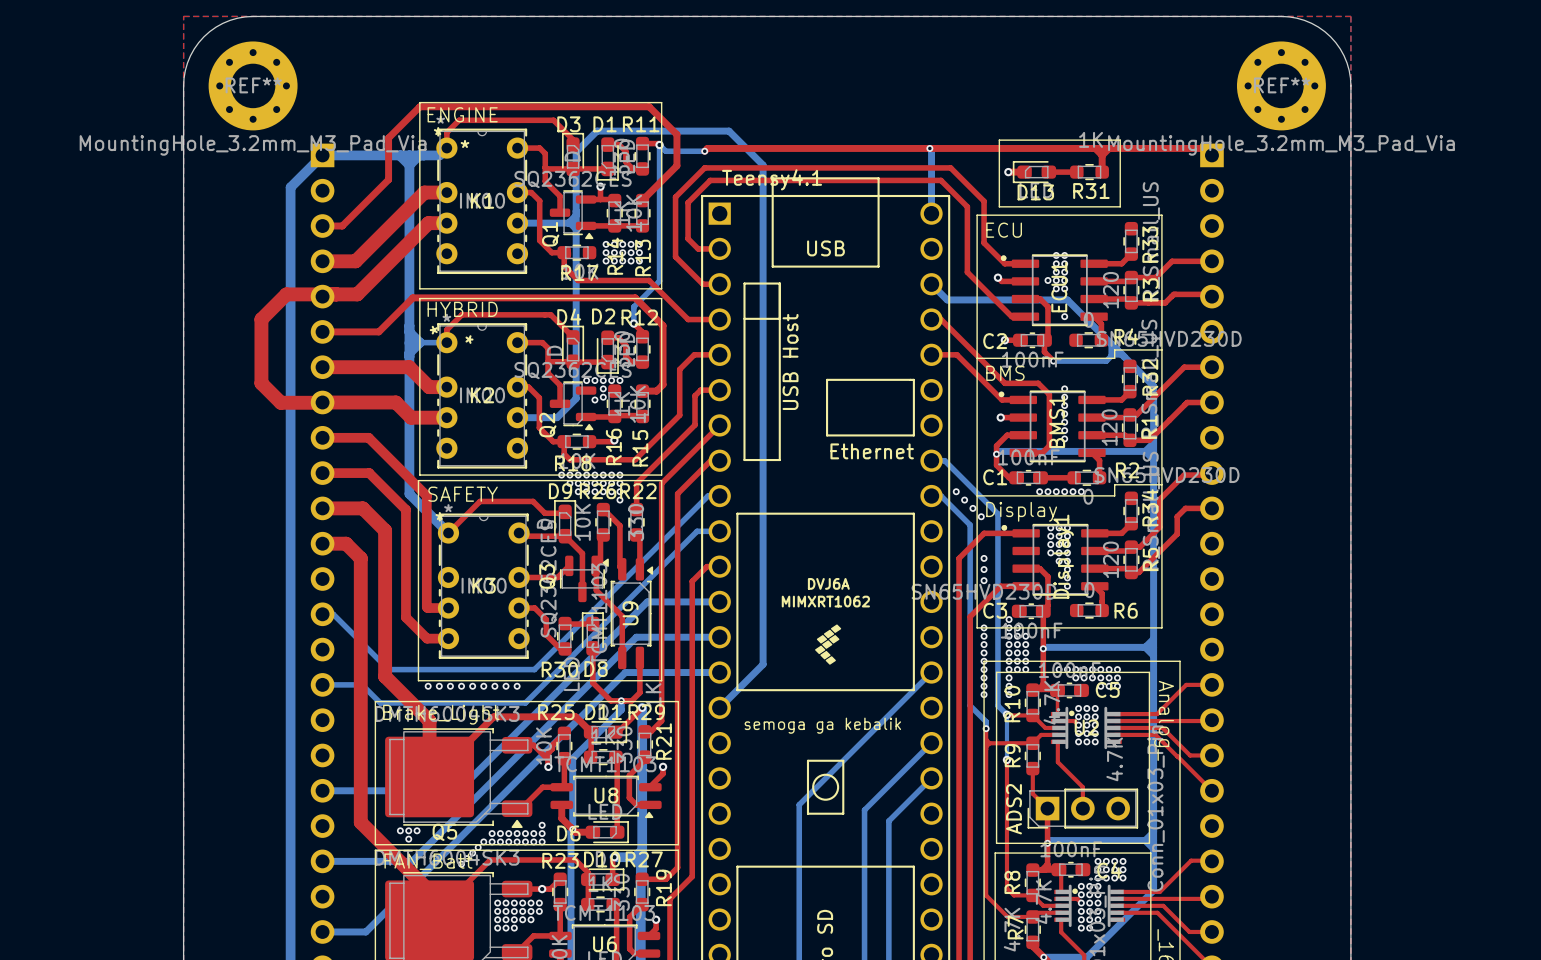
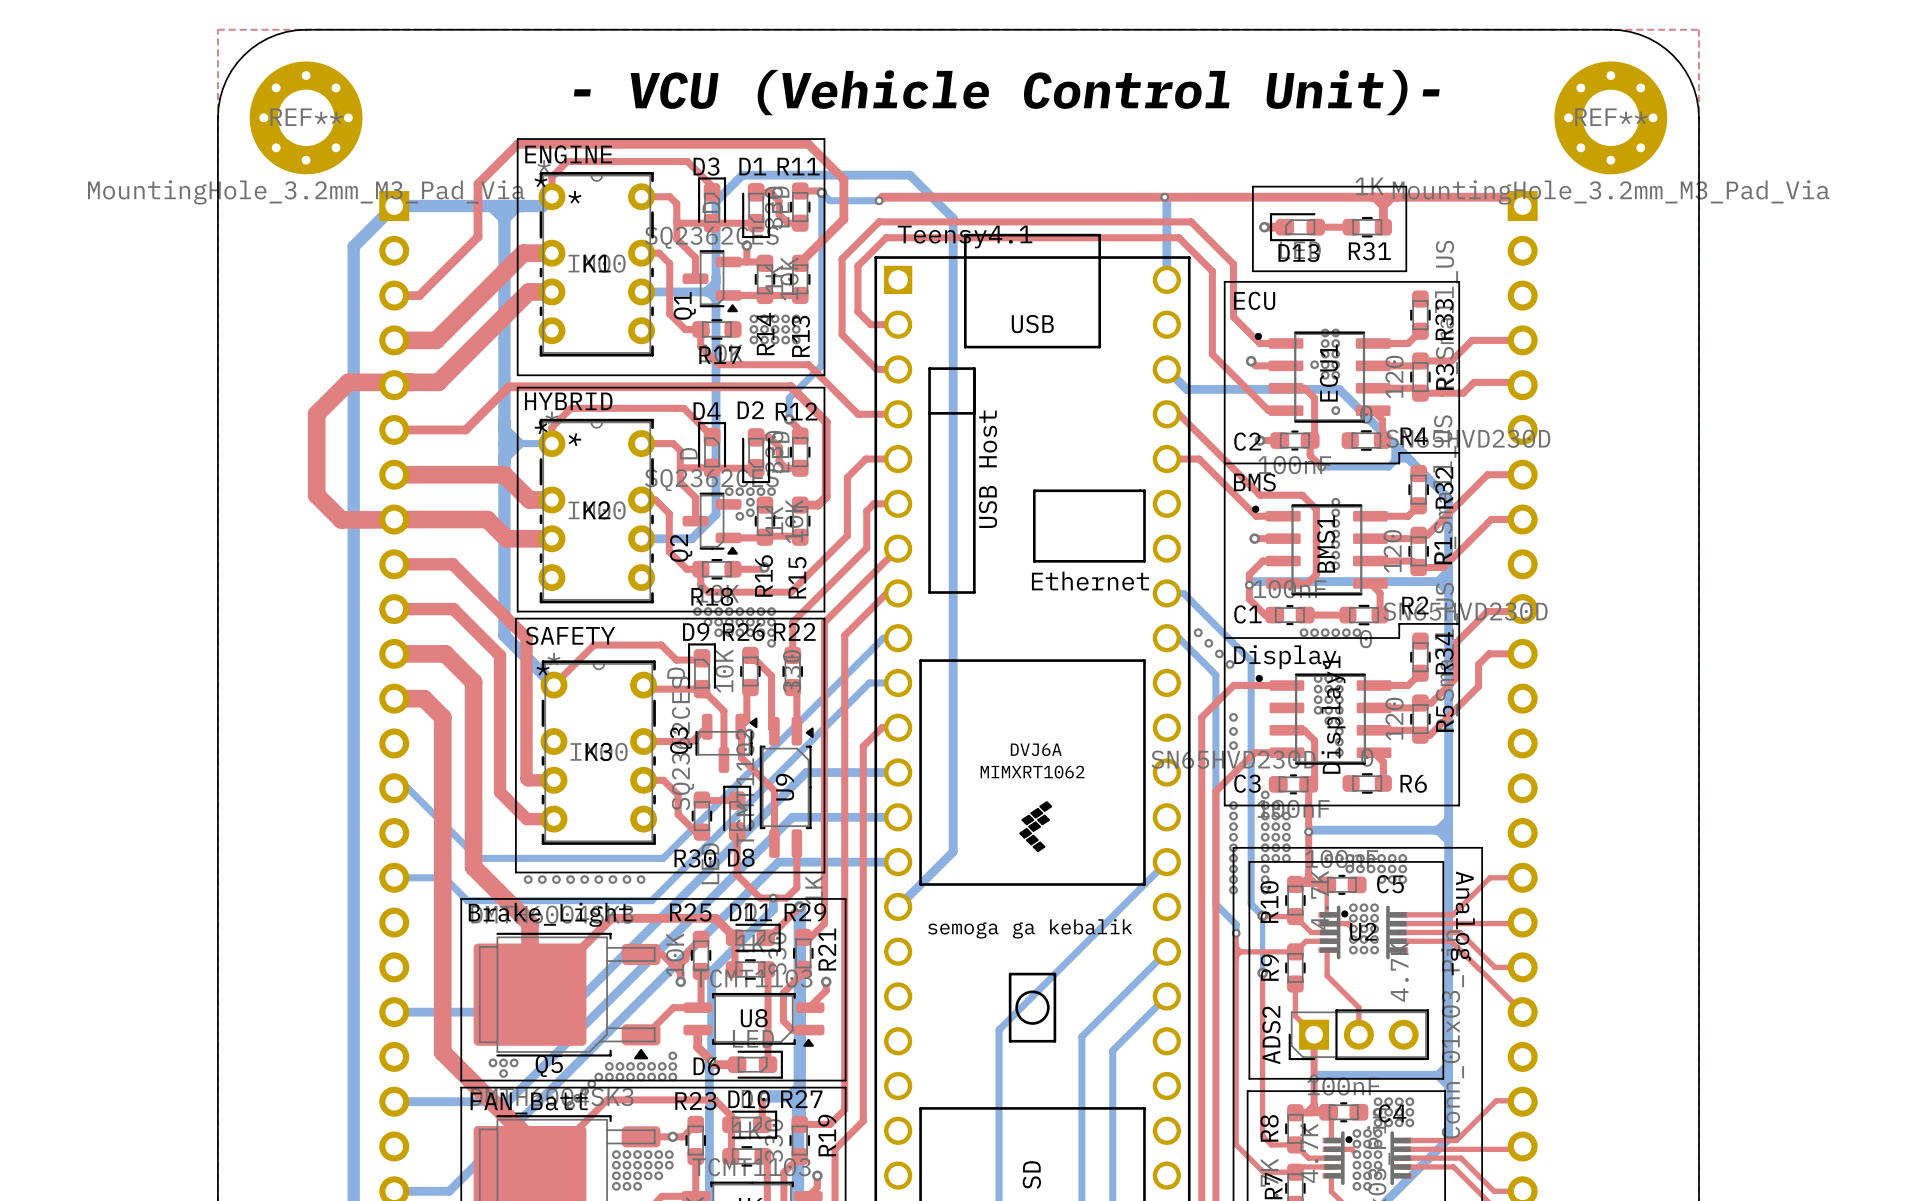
text: none -> - VCU (Vehicle Control Unit)- (1006, 92)

